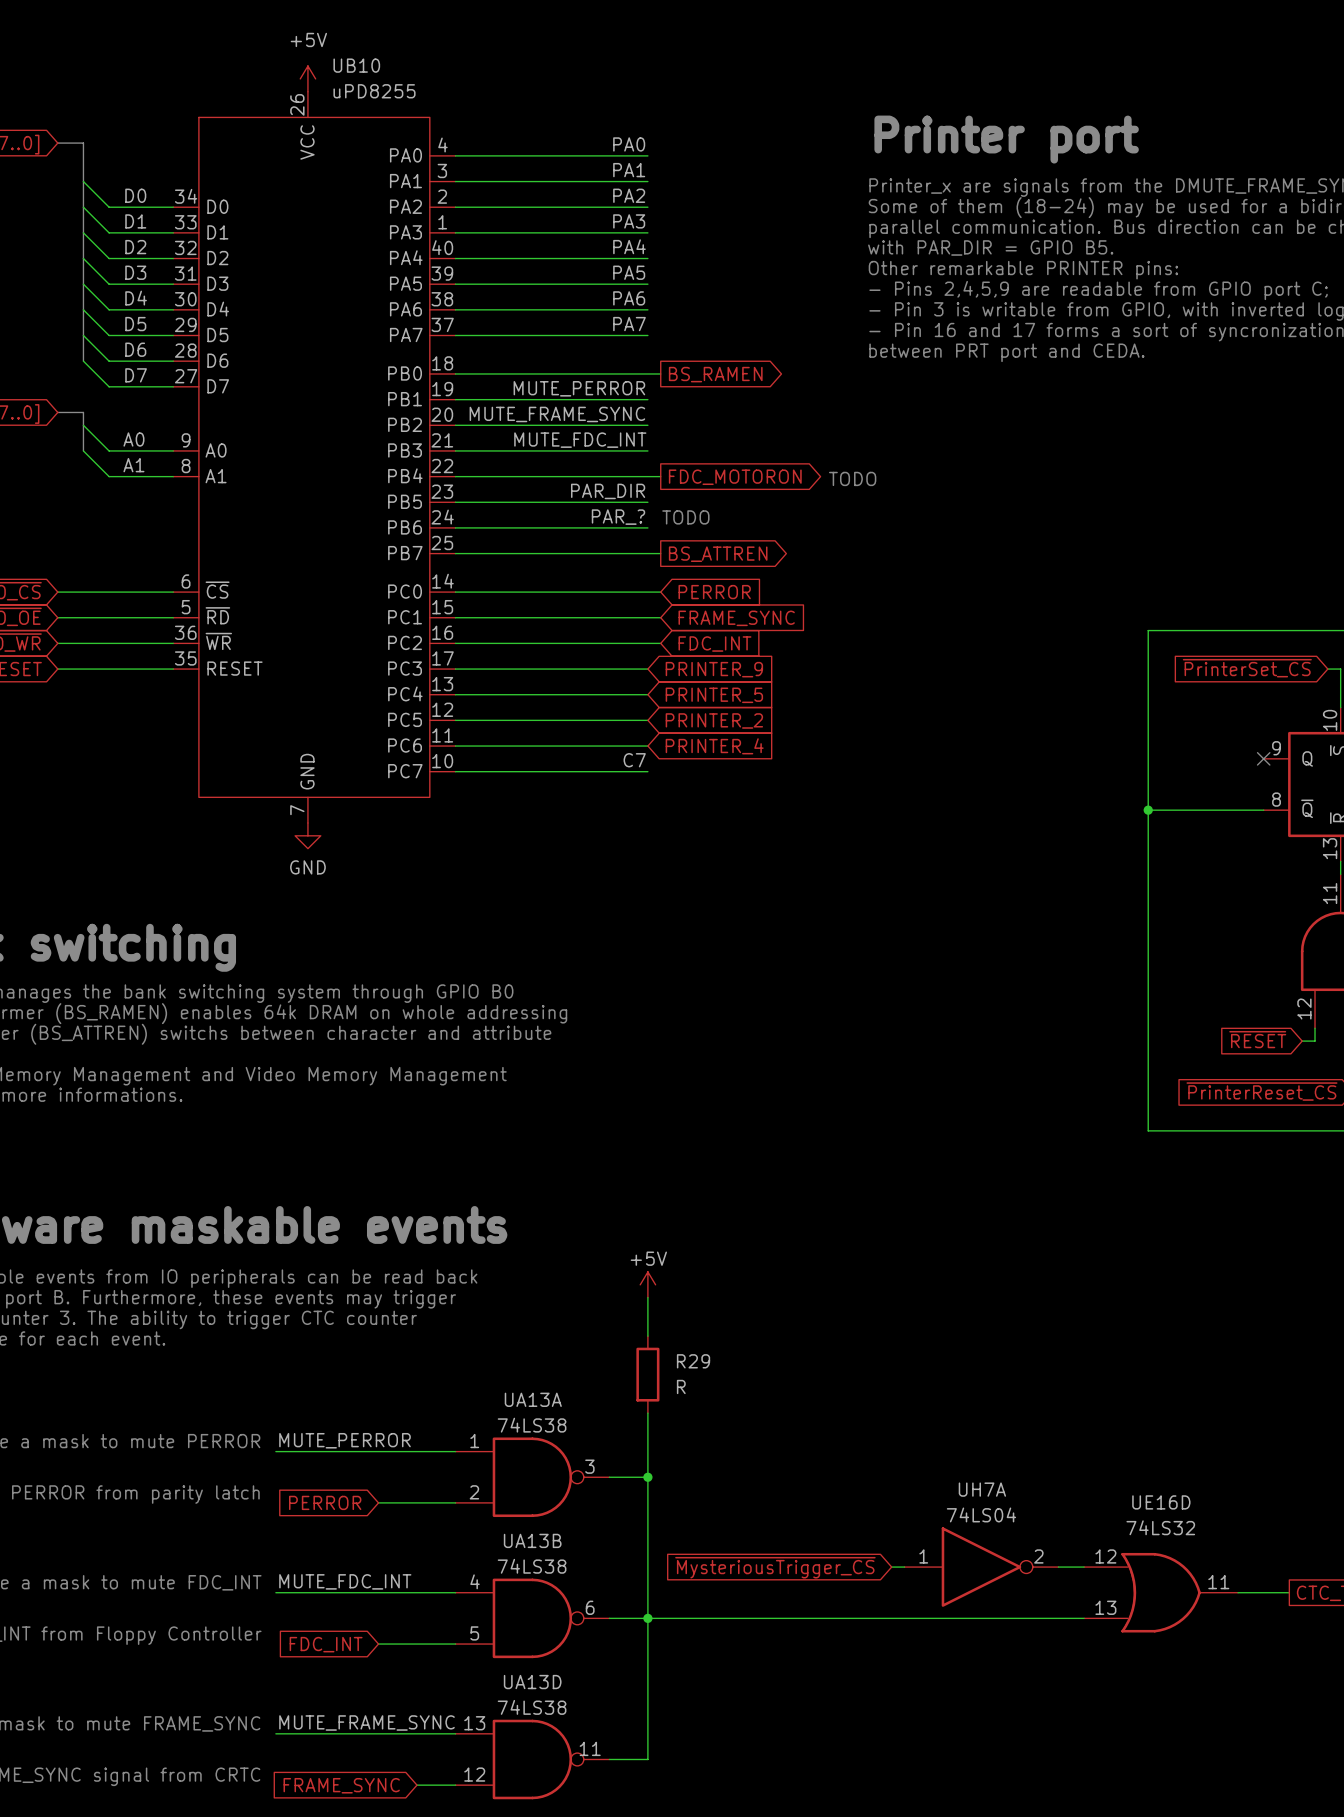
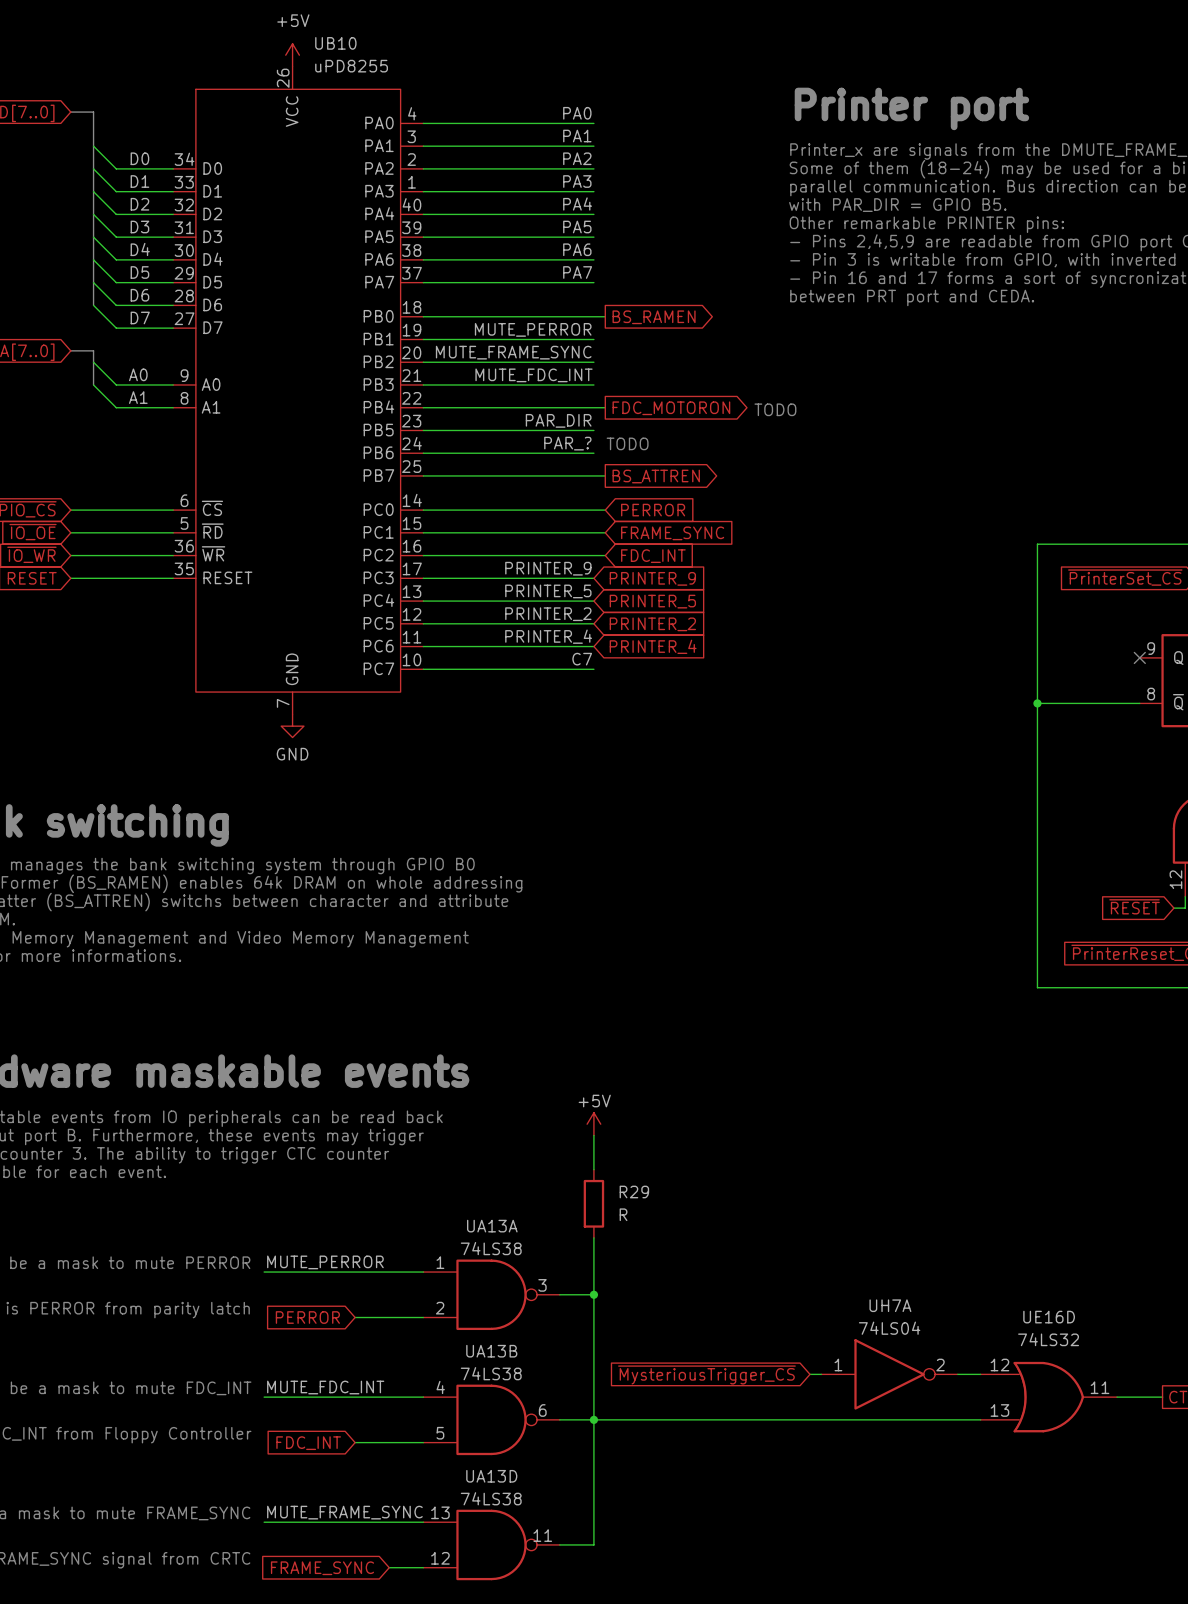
label: none -> PRINTER_9 (548, 568)
label: none -> PRINTER_5 (548, 591)
label: none -> PRINTER_2 (548, 614)
label: none -> PRINTER_4 (548, 636)

